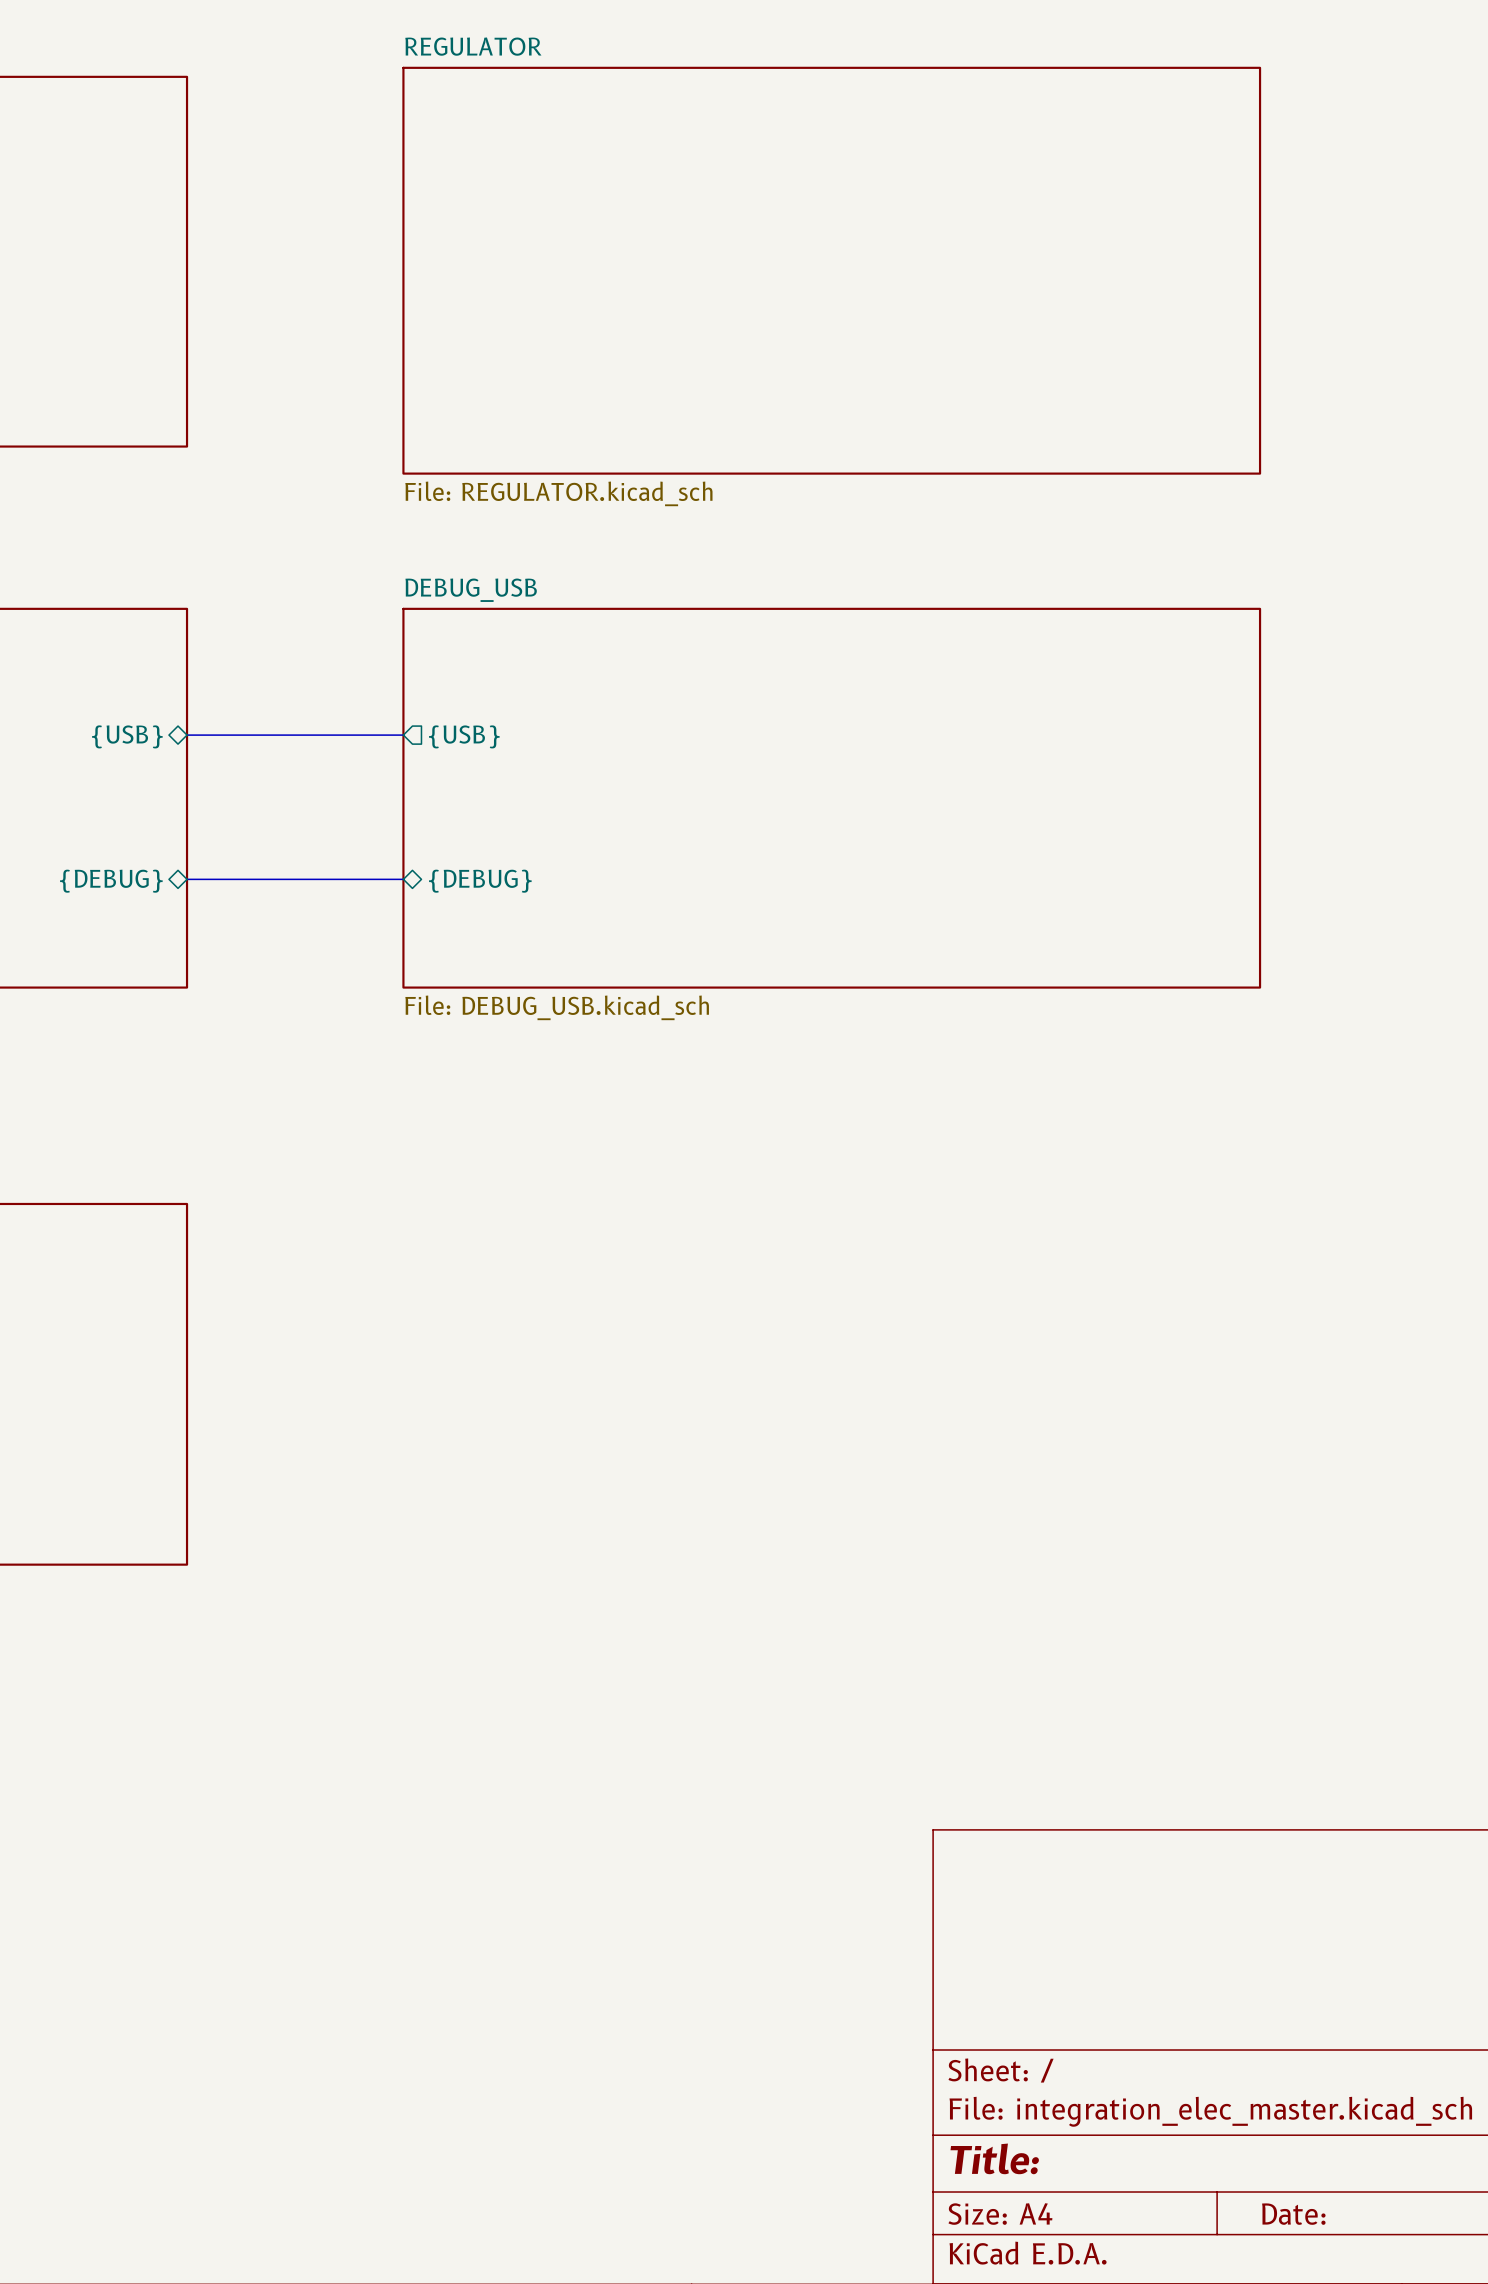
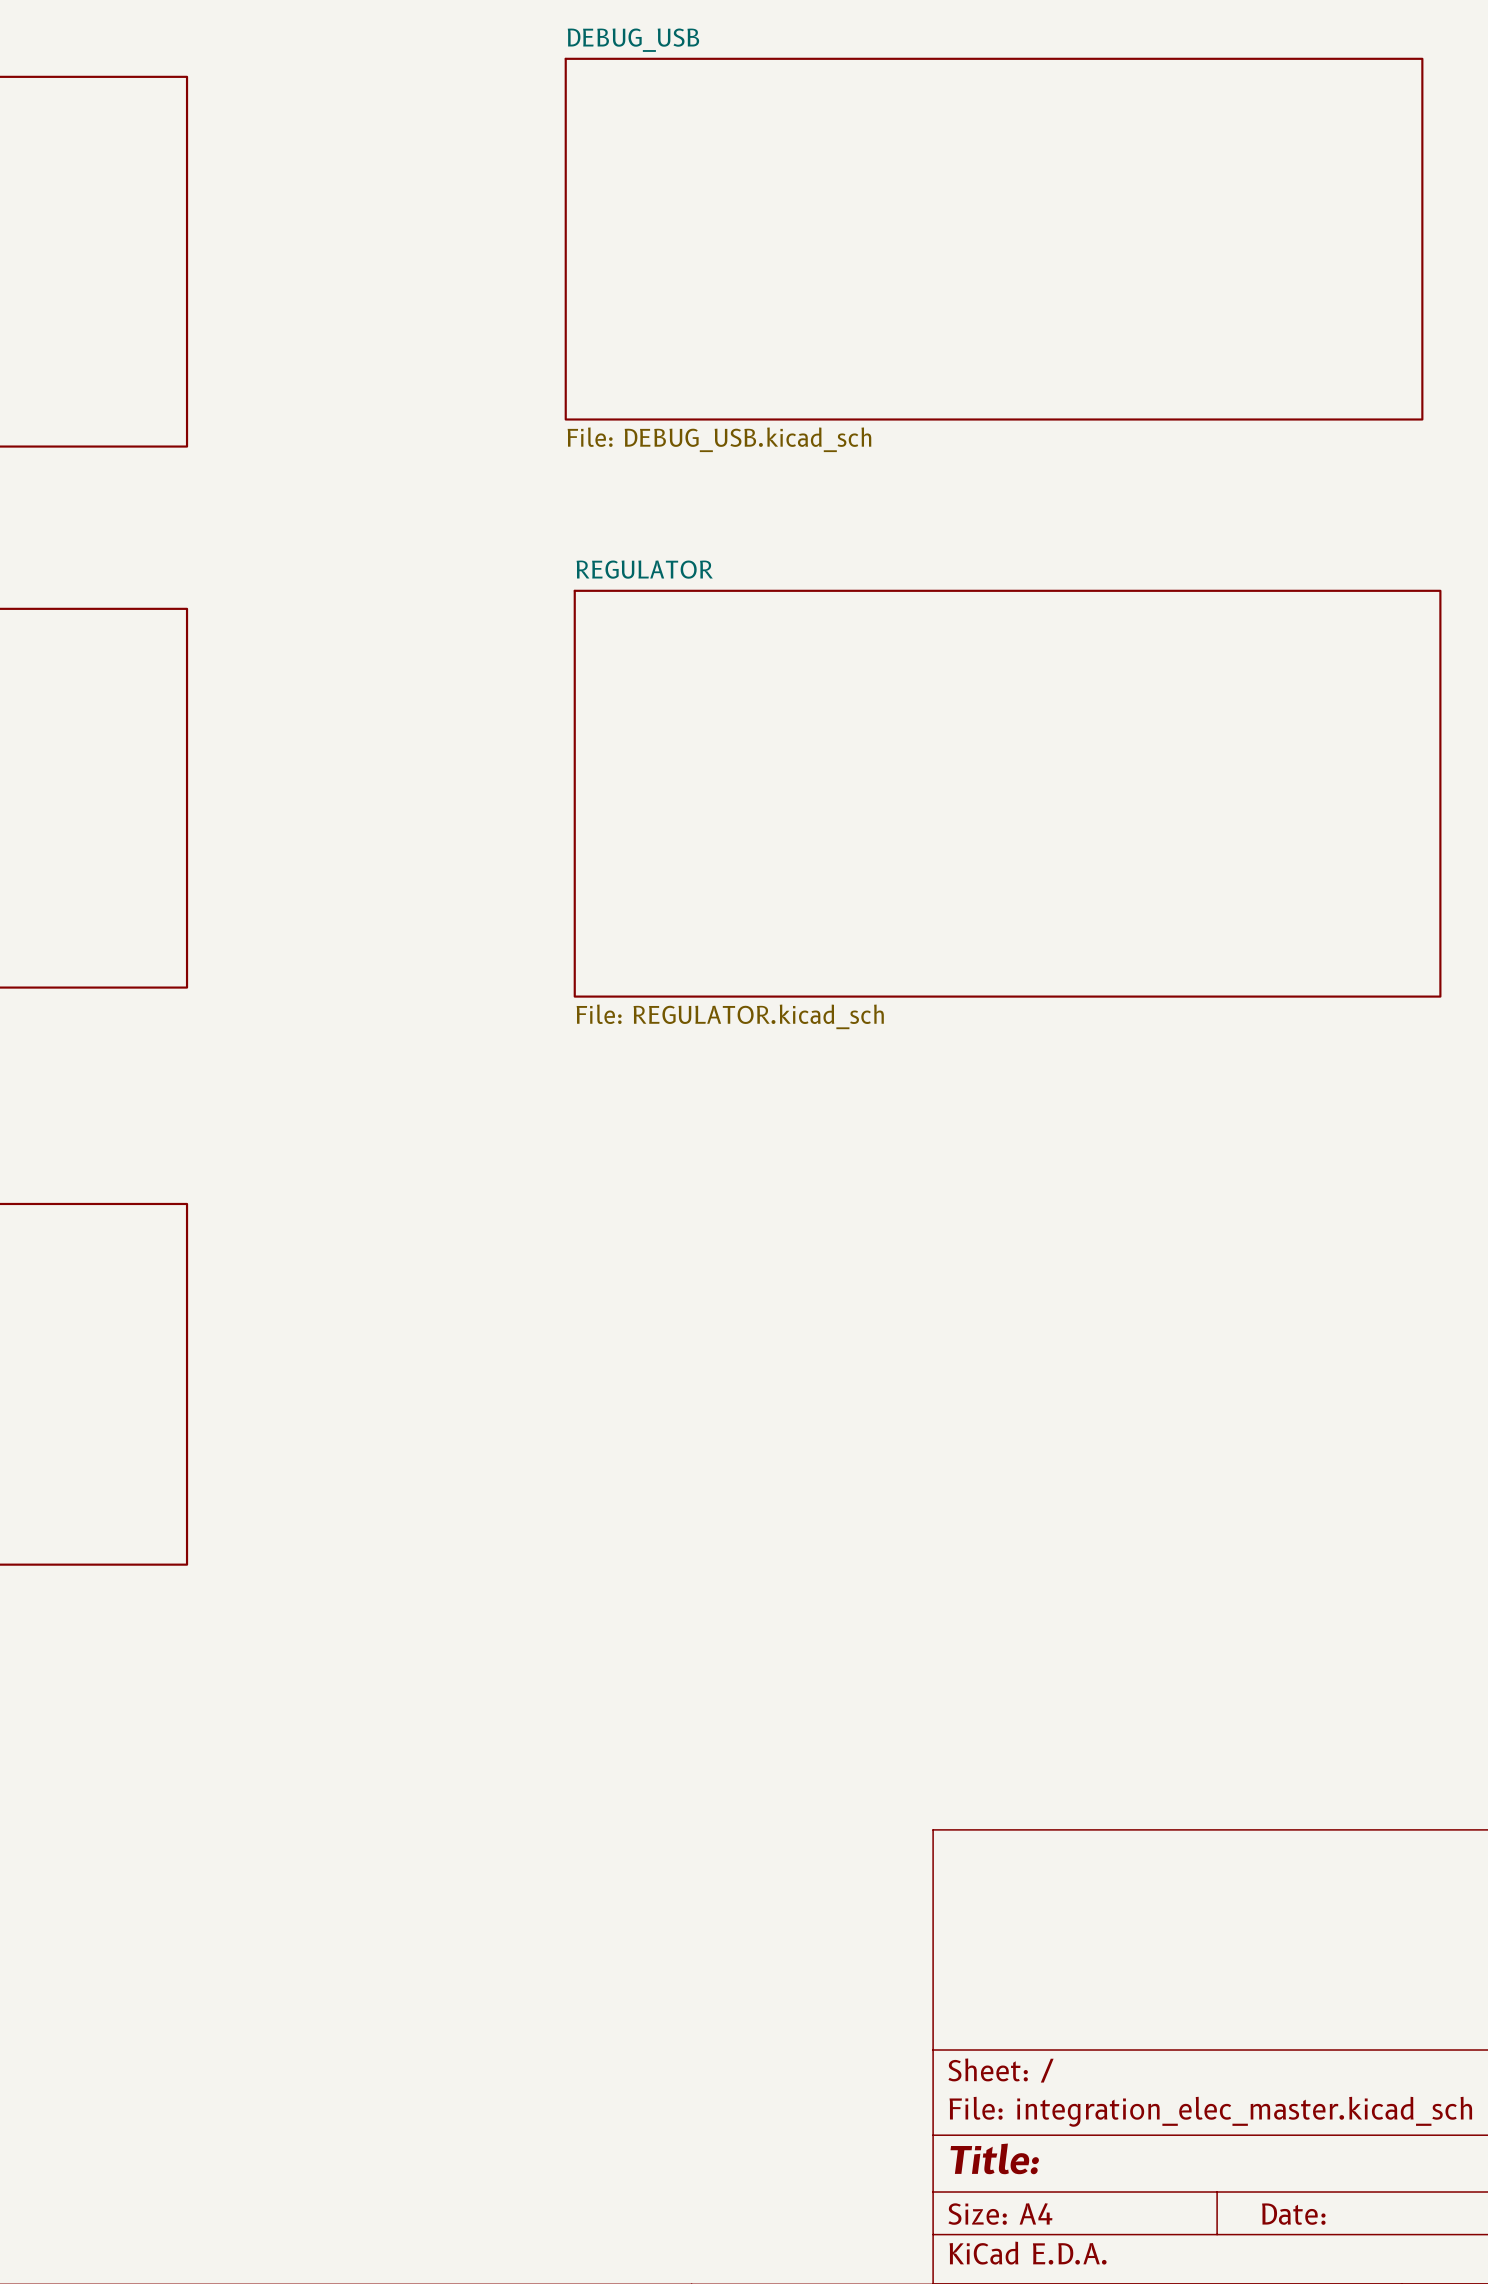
sheet DEBUG_USB: none -> File: DEBUG_USB.kicad_sch (994, 239)
sheet REGULATOR: File: REGULATOR.kicad_sch (831, 270) -> none
bus: (187, 735) (403, 735) -> none
sheet pin: {USB} (127, 736) -> none
sheet pin: {USB} (464, 736) -> none
sheet REGULATOR: none -> File: REGULATOR.kicad_sch (1007, 793)
sheet DEBUG_USB: File: DEBUG_USB.kicad_sch (831, 798) -> none
bus: (187, 879) (403, 879) -> none
sheet pin: {DEBUG} (111, 881) -> none
sheet pin: {DEBUG} (480, 881) -> none

